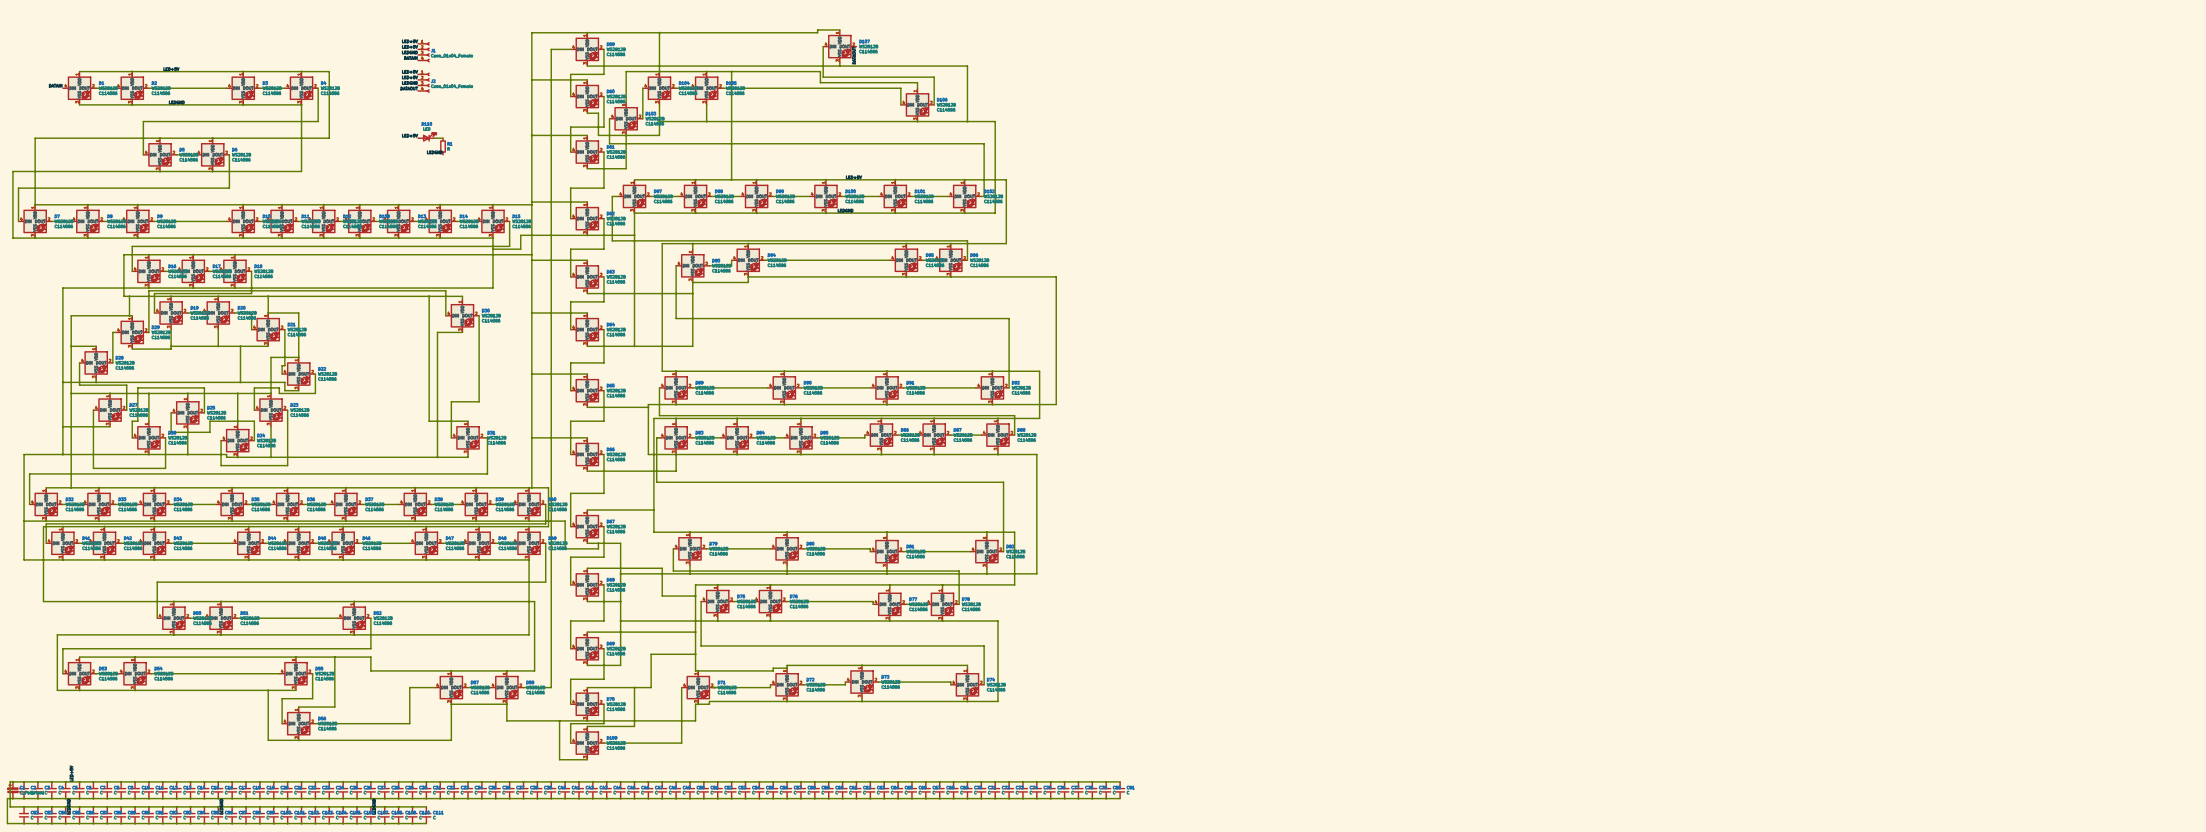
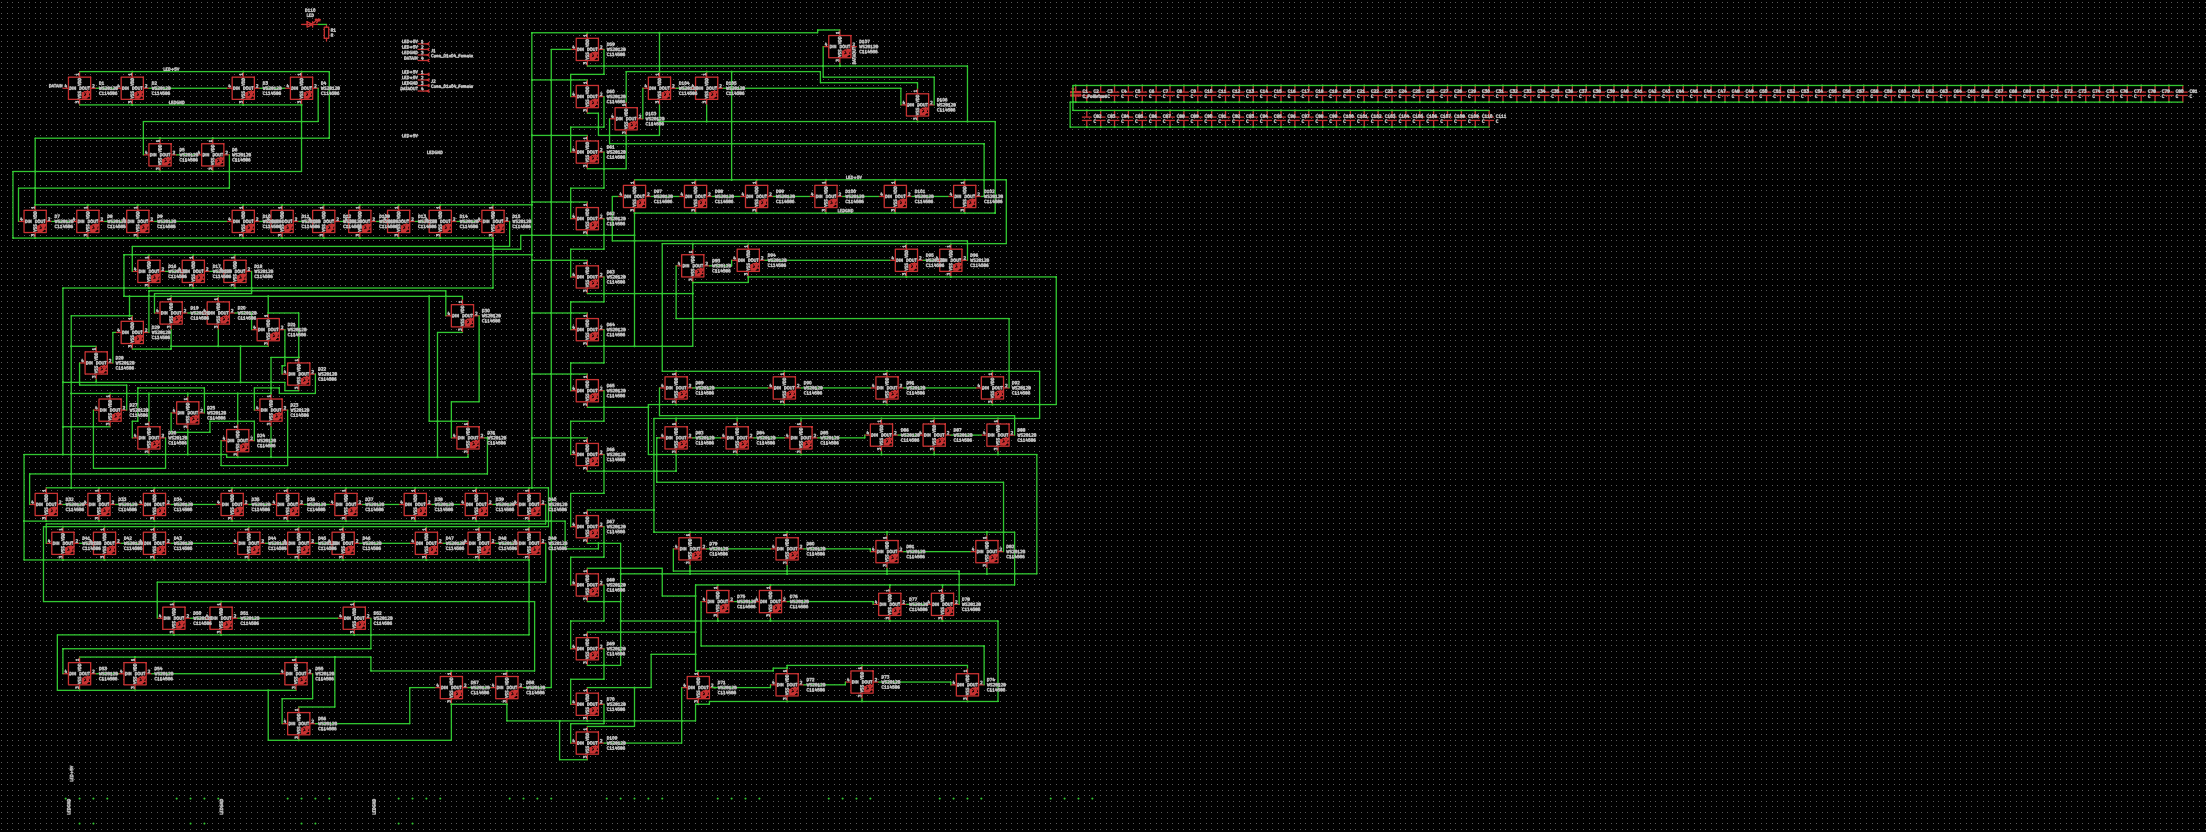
wire: none -> (318, 24) (326, 24)
wire: none -> (2182, 85) (1072, 85) (1072, 110) (1489, 110)
wire: none -> (2182, 102) (1070, 102) (1070, 127) (1489, 127)
part position: (427, 137) -> (310, 23)
wire: (434, 138) (443, 138) -> none
part position: (443, 146) -> (326, 32)
wire: (1120, 781) (10, 781) (10, 806) (426, 806) -> none
part position: (12, 790) -> (1075, 93)
part position: (24, 790) -> (1086, 93)
part position: (37, 790) -> (1100, 93)
part position: (51, 790) -> (1114, 93)
part position: (65, 790) -> (1128, 93)
part position: (79, 790) -> (1142, 93)
part position: (93, 790) -> (1156, 93)
part position: (107, 790) -> (1170, 93)
part position: (121, 790) -> (1183, 93)
part position: (135, 790) -> (1197, 93)
part position: (148, 790) -> (1211, 93)
part position: (162, 790) -> (1225, 93)
part position: (176, 790) -> (1239, 93)
part position: (190, 790) -> (1253, 93)
part position: (204, 790) -> (1267, 93)
part position: (218, 790) -> (1281, 93)
part position: (232, 790) -> (1294, 93)
part position: (246, 790) -> (1308, 93)
part position: (259, 790) -> (1322, 93)
part position: (273, 790) -> (1336, 93)
part position: (287, 790) -> (1350, 93)
part position: (301, 790) -> (1364, 93)
part position: (315, 790) -> (1378, 93)
part position: (329, 790) -> (1392, 93)
part position: (343, 790) -> (1405, 93)
part position: (357, 790) -> (1419, 93)
part position: (370, 790) -> (1433, 93)
part position: (384, 790) -> (1447, 93)
part position: (398, 790) -> (1461, 93)
part position: (412, 790) -> (1475, 93)
part position: (426, 790) -> (1489, 93)
part position: (440, 790) -> (1502, 93)
part position: (454, 790) -> (1516, 93)
part position: (468, 790) -> (1530, 93)
part position: (481, 790) -> (1544, 93)
part position: (495, 790) -> (1558, 93)
part position: (509, 790) -> (1572, 93)
part position: (523, 790) -> (1586, 93)
part position: (537, 790) -> (1600, 93)
part position: (551, 790) -> (1613, 93)
part position: (565, 790) -> (1627, 93)
part position: (579, 790) -> (1641, 93)
part position: (592, 790) -> (1655, 93)
part position: (606, 790) -> (1669, 93)
part position: (620, 790) -> (1683, 93)
part position: (634, 790) -> (1697, 93)
part position: (648, 790) -> (1711, 93)
part position: (662, 790) -> (1724, 93)
part position: (676, 790) -> (1738, 93)
part position: (689, 790) -> (1752, 93)
part position: (703, 790) -> (1766, 93)
part position: (717, 790) -> (1780, 93)
part position: (731, 790) -> (1794, 93)
part position: (745, 790) -> (1808, 93)
part position: (759, 790) -> (1822, 93)
part position: (773, 790) -> (1835, 93)
part position: (787, 790) -> (1849, 93)
part position: (800, 790) -> (1863, 93)
part position: (814, 790) -> (1877, 93)
part position: (828, 790) -> (1891, 93)
part position: (842, 790) -> (1905, 93)
part position: (856, 790) -> (1919, 93)
part position: (870, 790) -> (1933, 93)
part position: (884, 790) -> (1946, 93)
part position: (898, 790) -> (1960, 93)
part position: (911, 790) -> (1974, 93)
part position: (925, 790) -> (1988, 93)
part position: (939, 790) -> (2002, 93)
part position: (953, 790) -> (2016, 93)
part position: (967, 790) -> (2030, 93)
part position: (981, 790) -> (2044, 93)
part position: (995, 790) -> (2057, 93)
part position: (1009, 790) -> (2071, 93)
part position: (1022, 790) -> (2085, 93)
part position: (1036, 790) -> (2099, 93)
part position: (1050, 790) -> (2113, 93)
part position: (1064, 790) -> (2127, 93)
part position: (1078, 790) -> (2141, 93)
part position: (1092, 790) -> (2155, 93)
part position: (1106, 790) -> (2168, 93)
part position: (1120, 790) -> (2182, 93)
wire: (1120, 798) (7, 798) (7, 823) (426, 823) -> none
part position: (24, 815) -> (1086, 118)
part position: (37, 815) -> (1100, 118)
part position: (51, 815) -> (1114, 118)
part position: (65, 815) -> (1128, 118)
part position: (79, 815) -> (1142, 118)
part position: (93, 815) -> (1156, 118)
part position: (107, 815) -> (1170, 118)
part position: (121, 815) -> (1183, 118)
part position: (135, 815) -> (1197, 118)
part position: (148, 815) -> (1211, 118)
part position: (162, 815) -> (1225, 118)
part position: (176, 815) -> (1239, 118)
part position: (190, 815) -> (1253, 118)
part position: (204, 815) -> (1267, 118)
part position: (218, 815) -> (1281, 118)
part position: (232, 815) -> (1294, 118)
part position: (246, 815) -> (1308, 118)
part position: (259, 815) -> (1322, 118)
part position: (273, 815) -> (1336, 118)
part position: (287, 815) -> (1350, 118)
part position: (301, 815) -> (1364, 118)
part position: (315, 815) -> (1378, 118)
part position: (329, 815) -> (1392, 118)
part position: (343, 815) -> (1405, 118)
part position: (357, 815) -> (1419, 118)
part position: (370, 815) -> (1433, 118)
part position: (384, 815) -> (1447, 118)
part position: (398, 815) -> (1461, 118)
part position: (412, 815) -> (1475, 118)
part position: (426, 815) -> (1489, 118)

